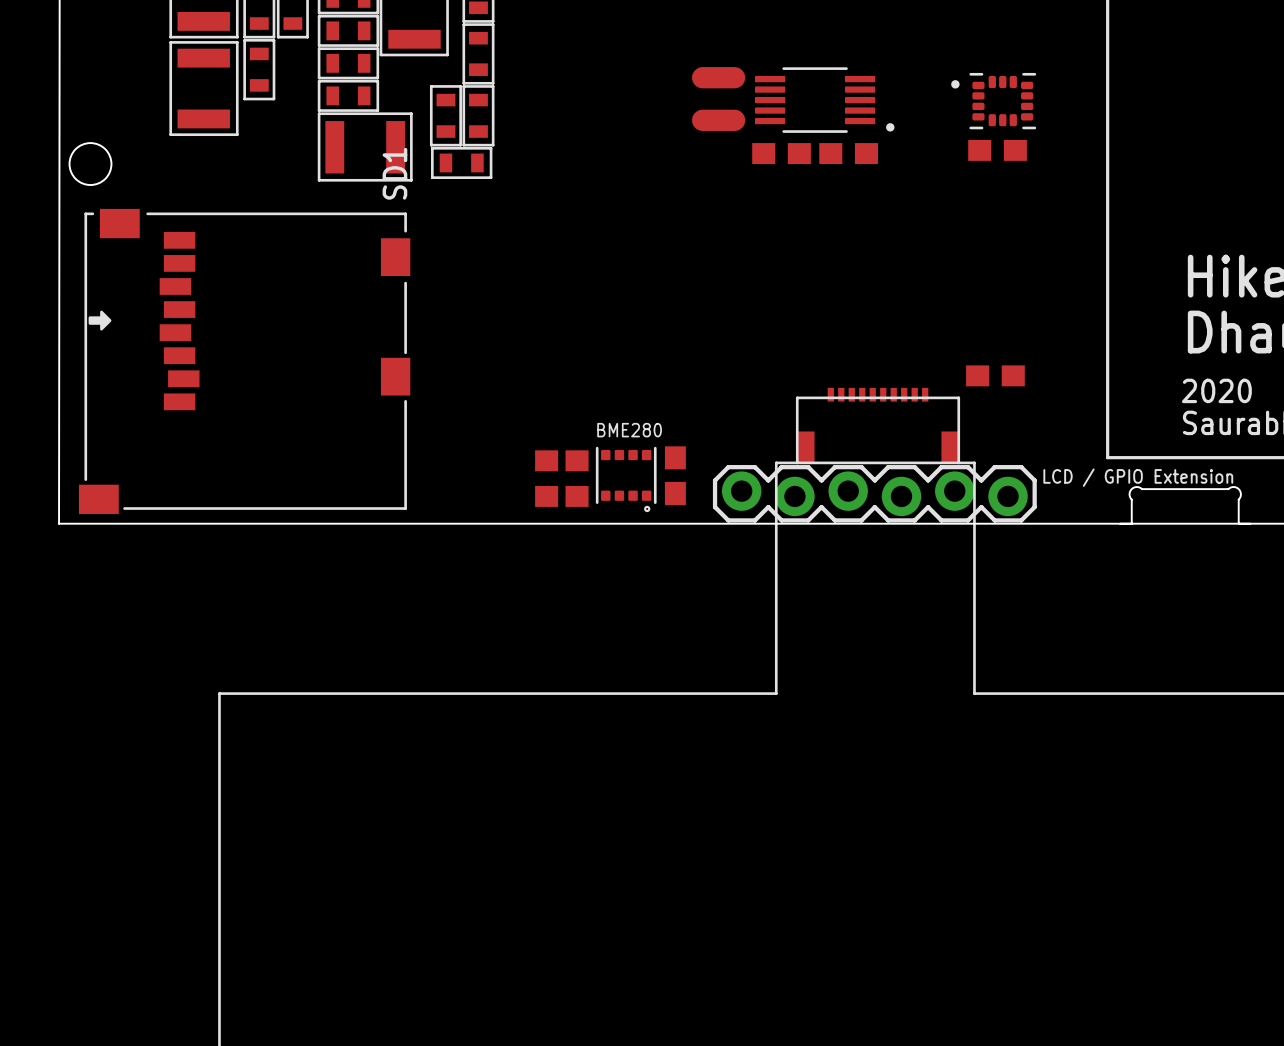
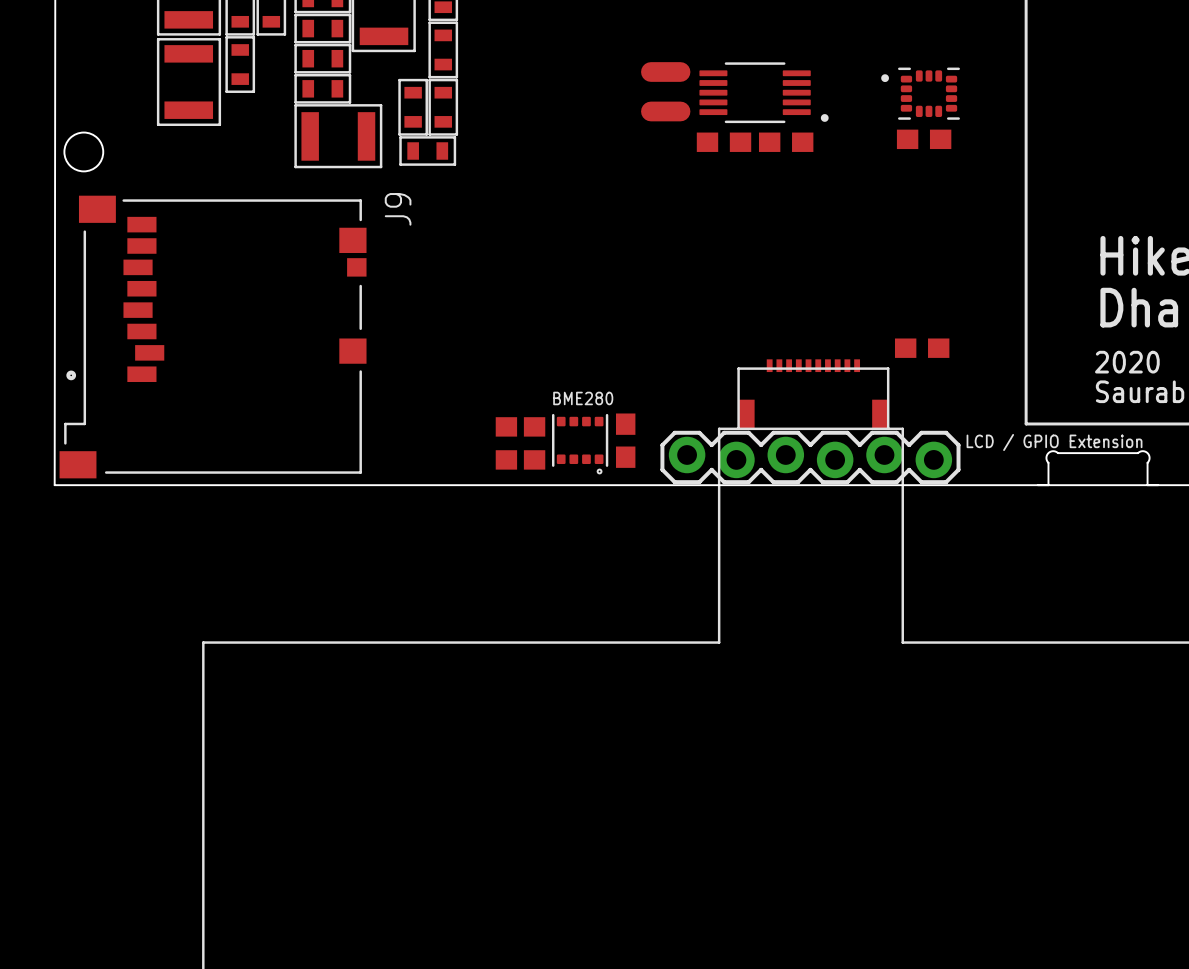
SD1: (244, 361) -> none
J9: none -> (213, 337)

